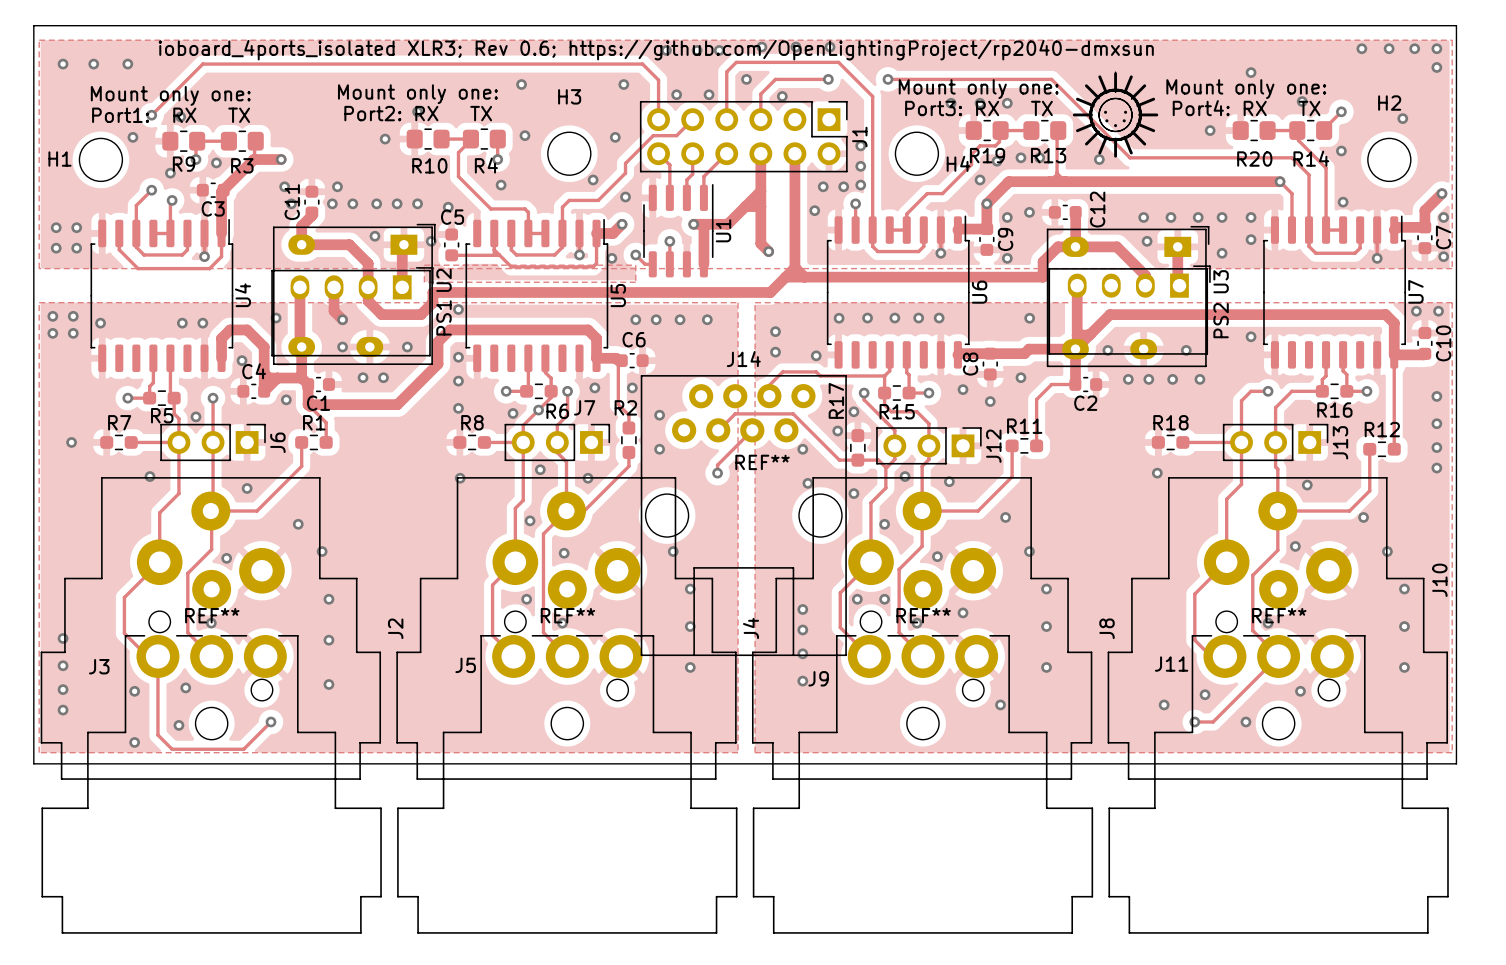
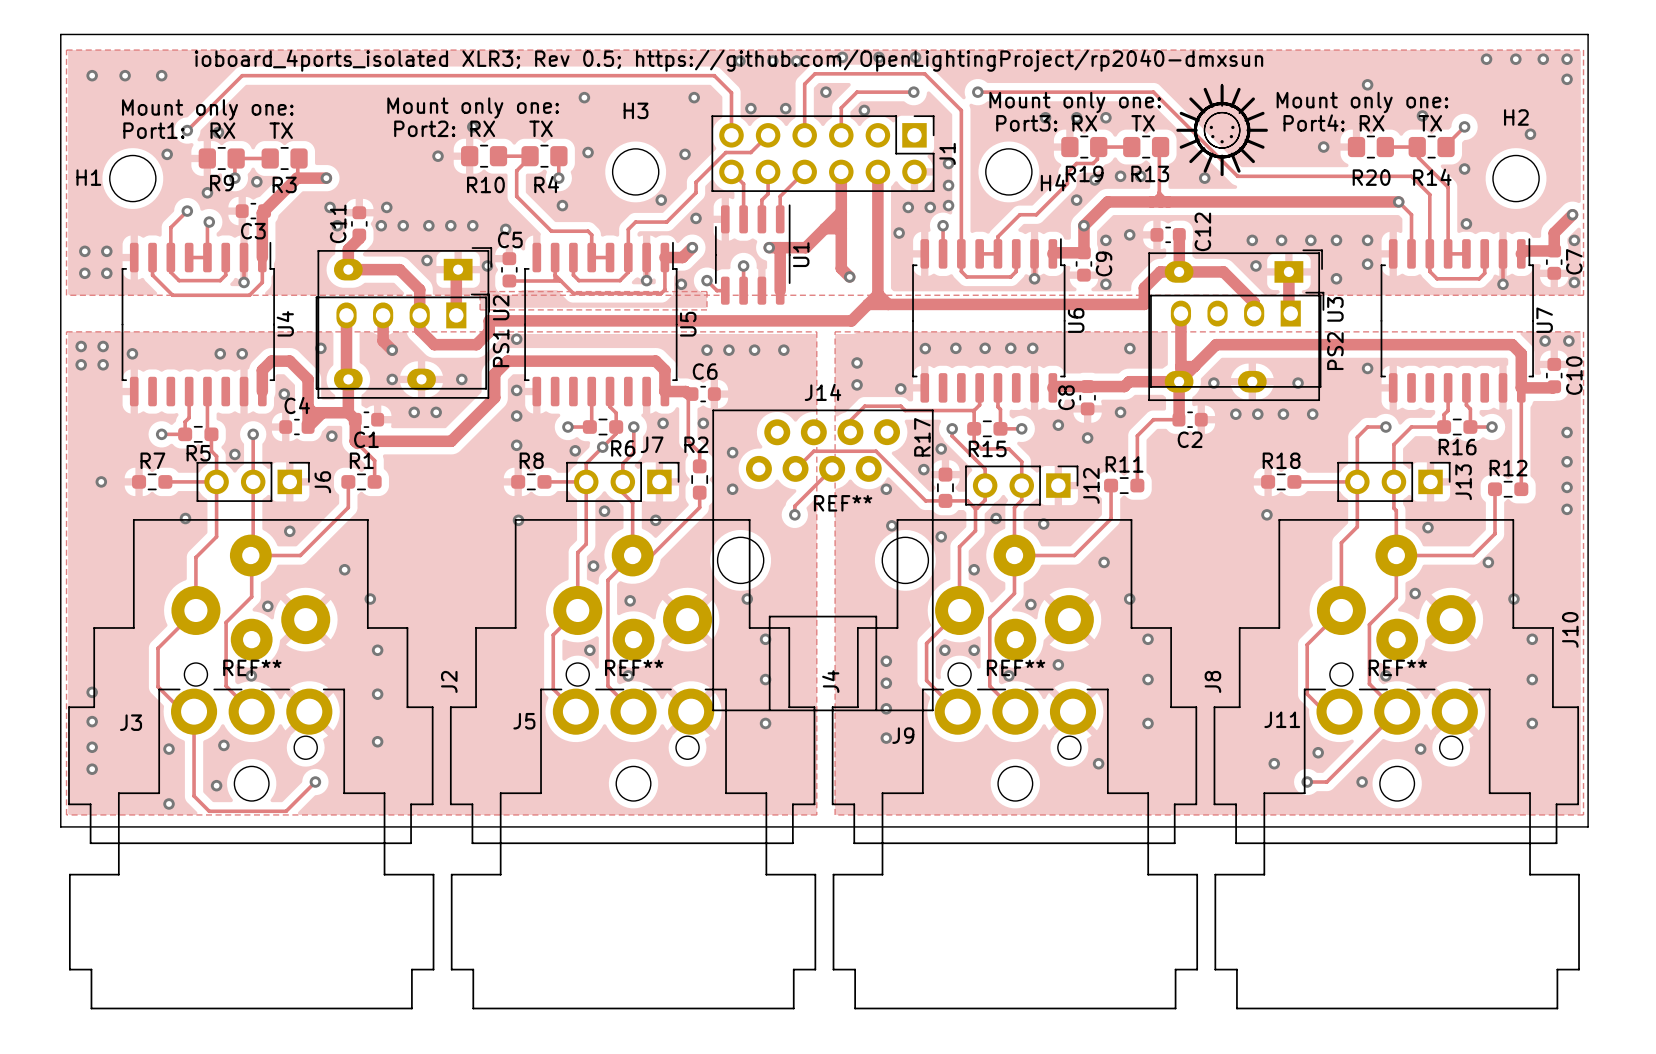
text: ioboard_4ports_isolated XLR3; Rev 0.6; https://github.com/OpenLightingProject/rp2040-dmxsun (656, 50) -> ioboard_4ports_isolated XLR3; Rev 0.5; https://github.com/OpenLightingProject/rp2040-dmxsun (728, 60)

